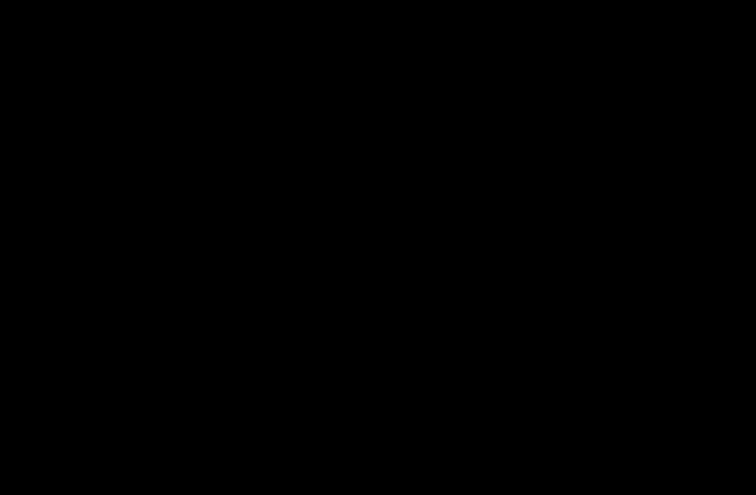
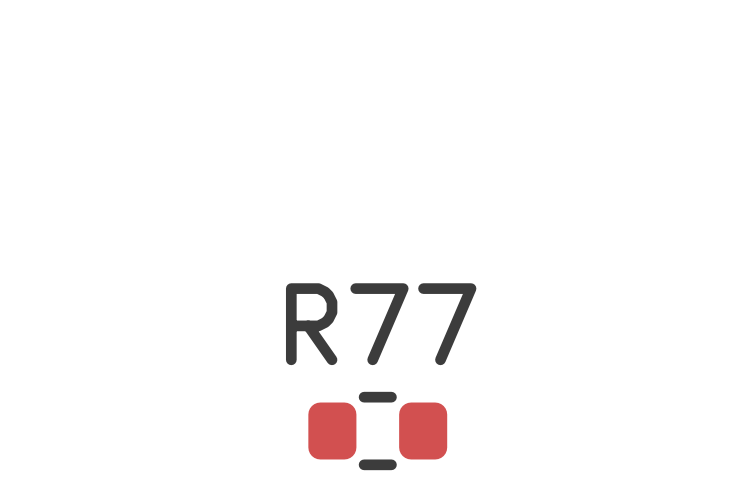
R77: none -> (377, 431)

